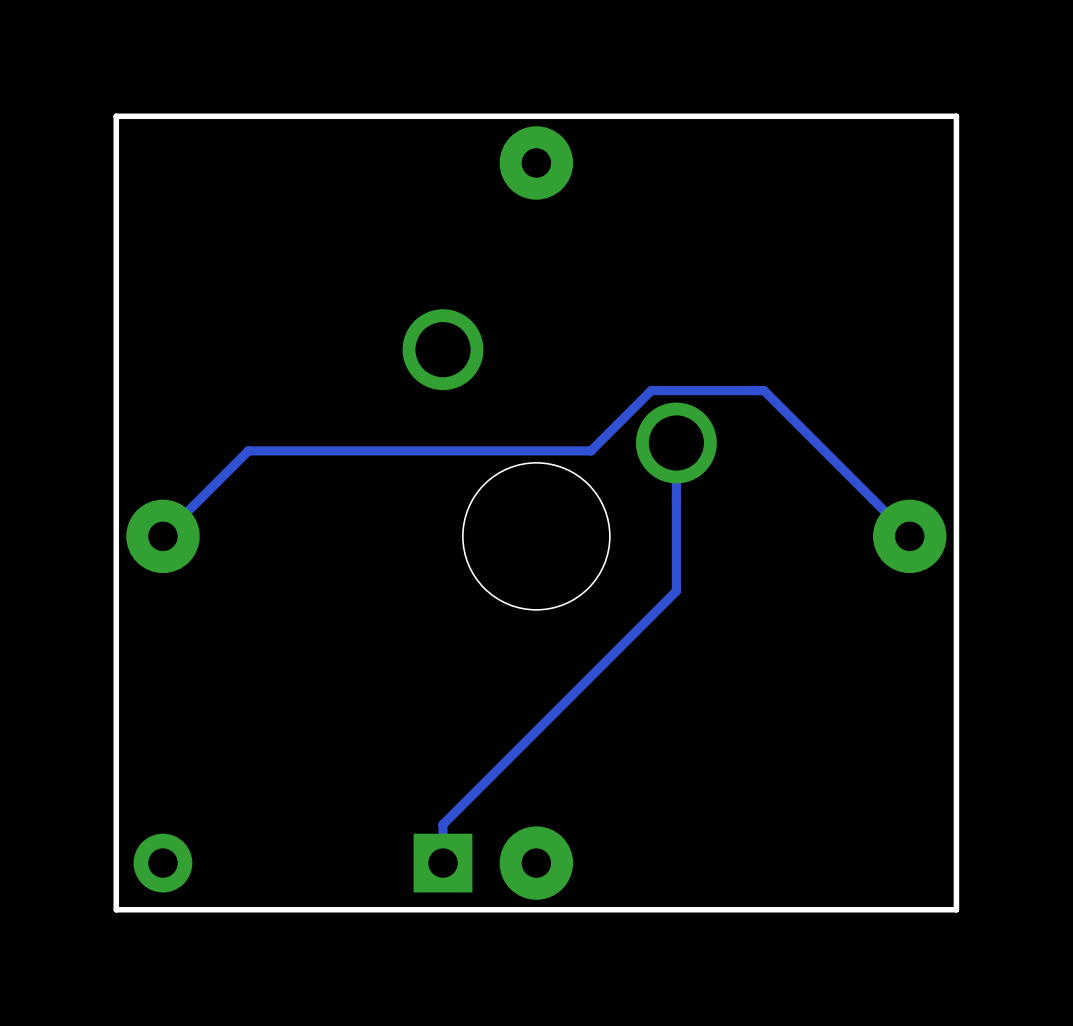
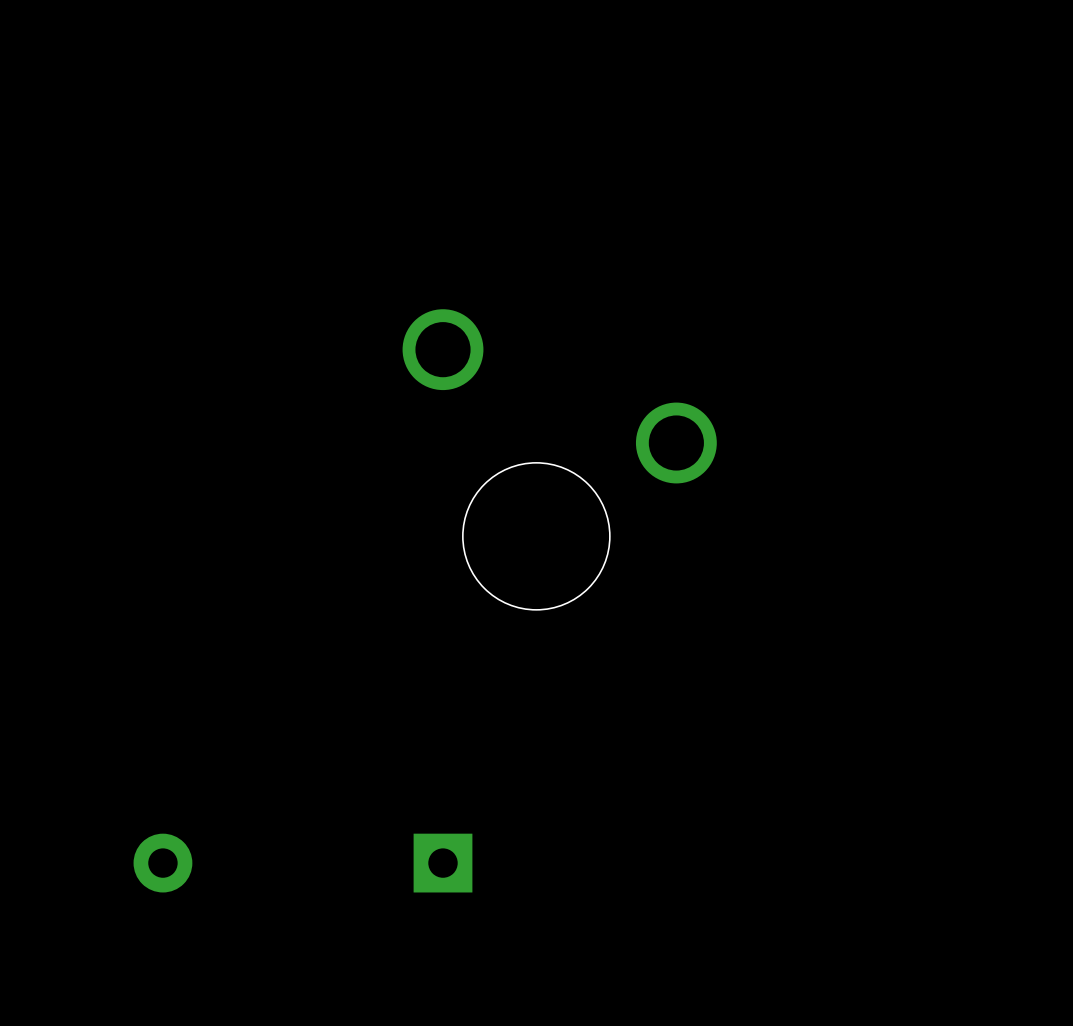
board edge: (956, 116) (956, 909) (116, 909) (116, 116) (956, 116) -> none
part: (536, 162) -> none
track: (676, 443) (676, 591) (443, 824) (443, 863) -> none
part: (162, 536) -> none
track: (909, 536) (764, 390) (651, 390) (590, 450) (248, 450) (162, 536) -> none
part: (909, 536) -> none
part: (536, 863) -> none

